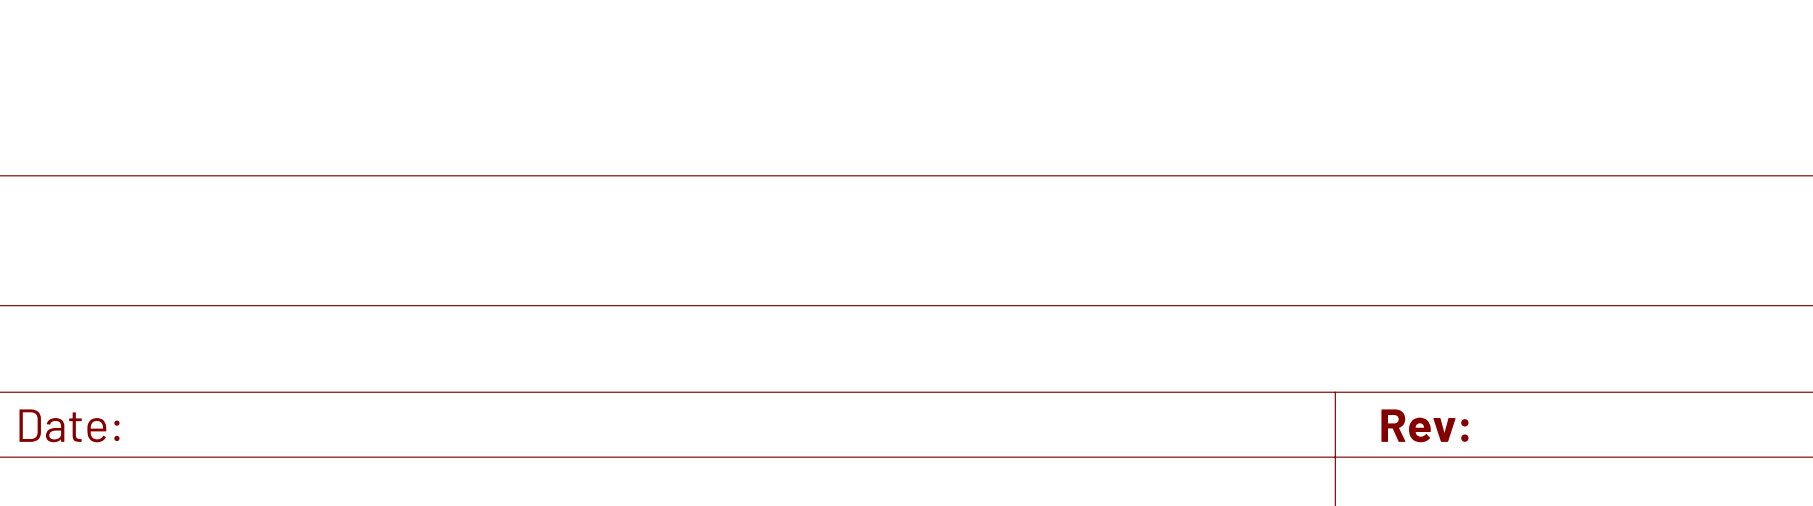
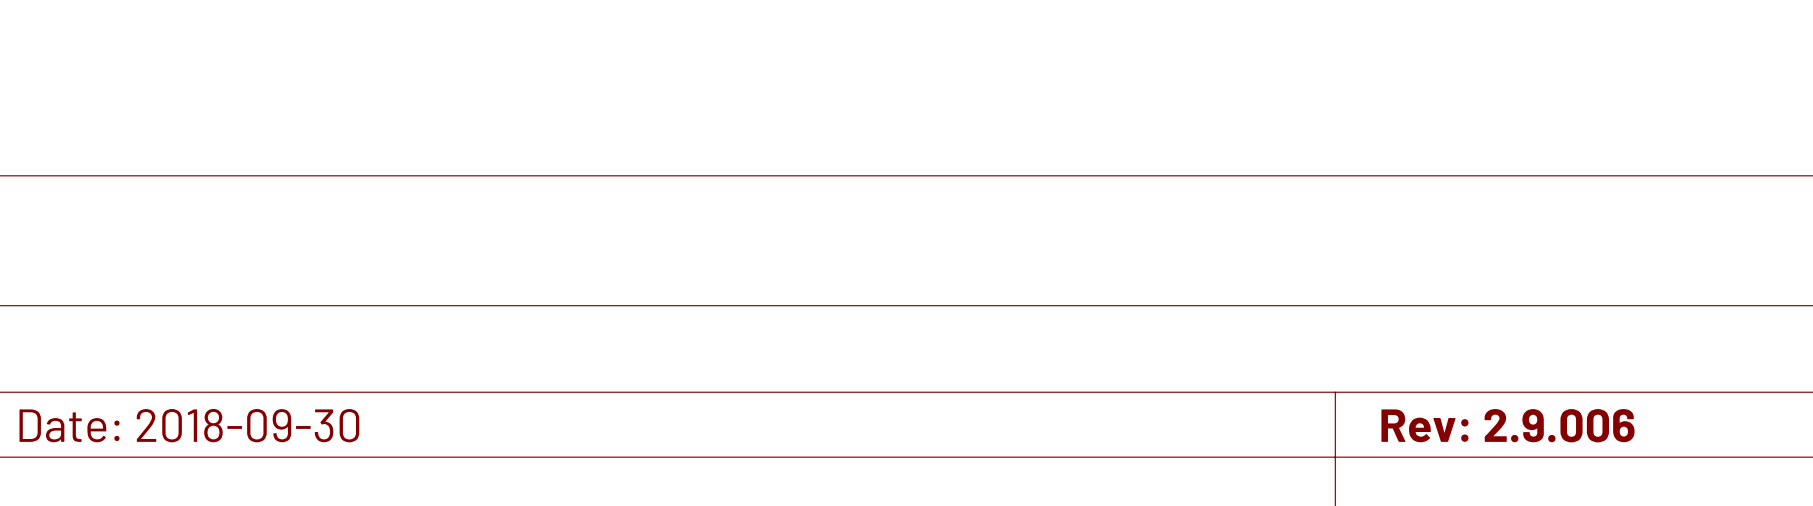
title block: Date: (69, 425) -> Date: 2018-09-30 (189, 425)
title block: Rev: (1424, 425) -> Rev: 2.9.006 (1508, 425)

